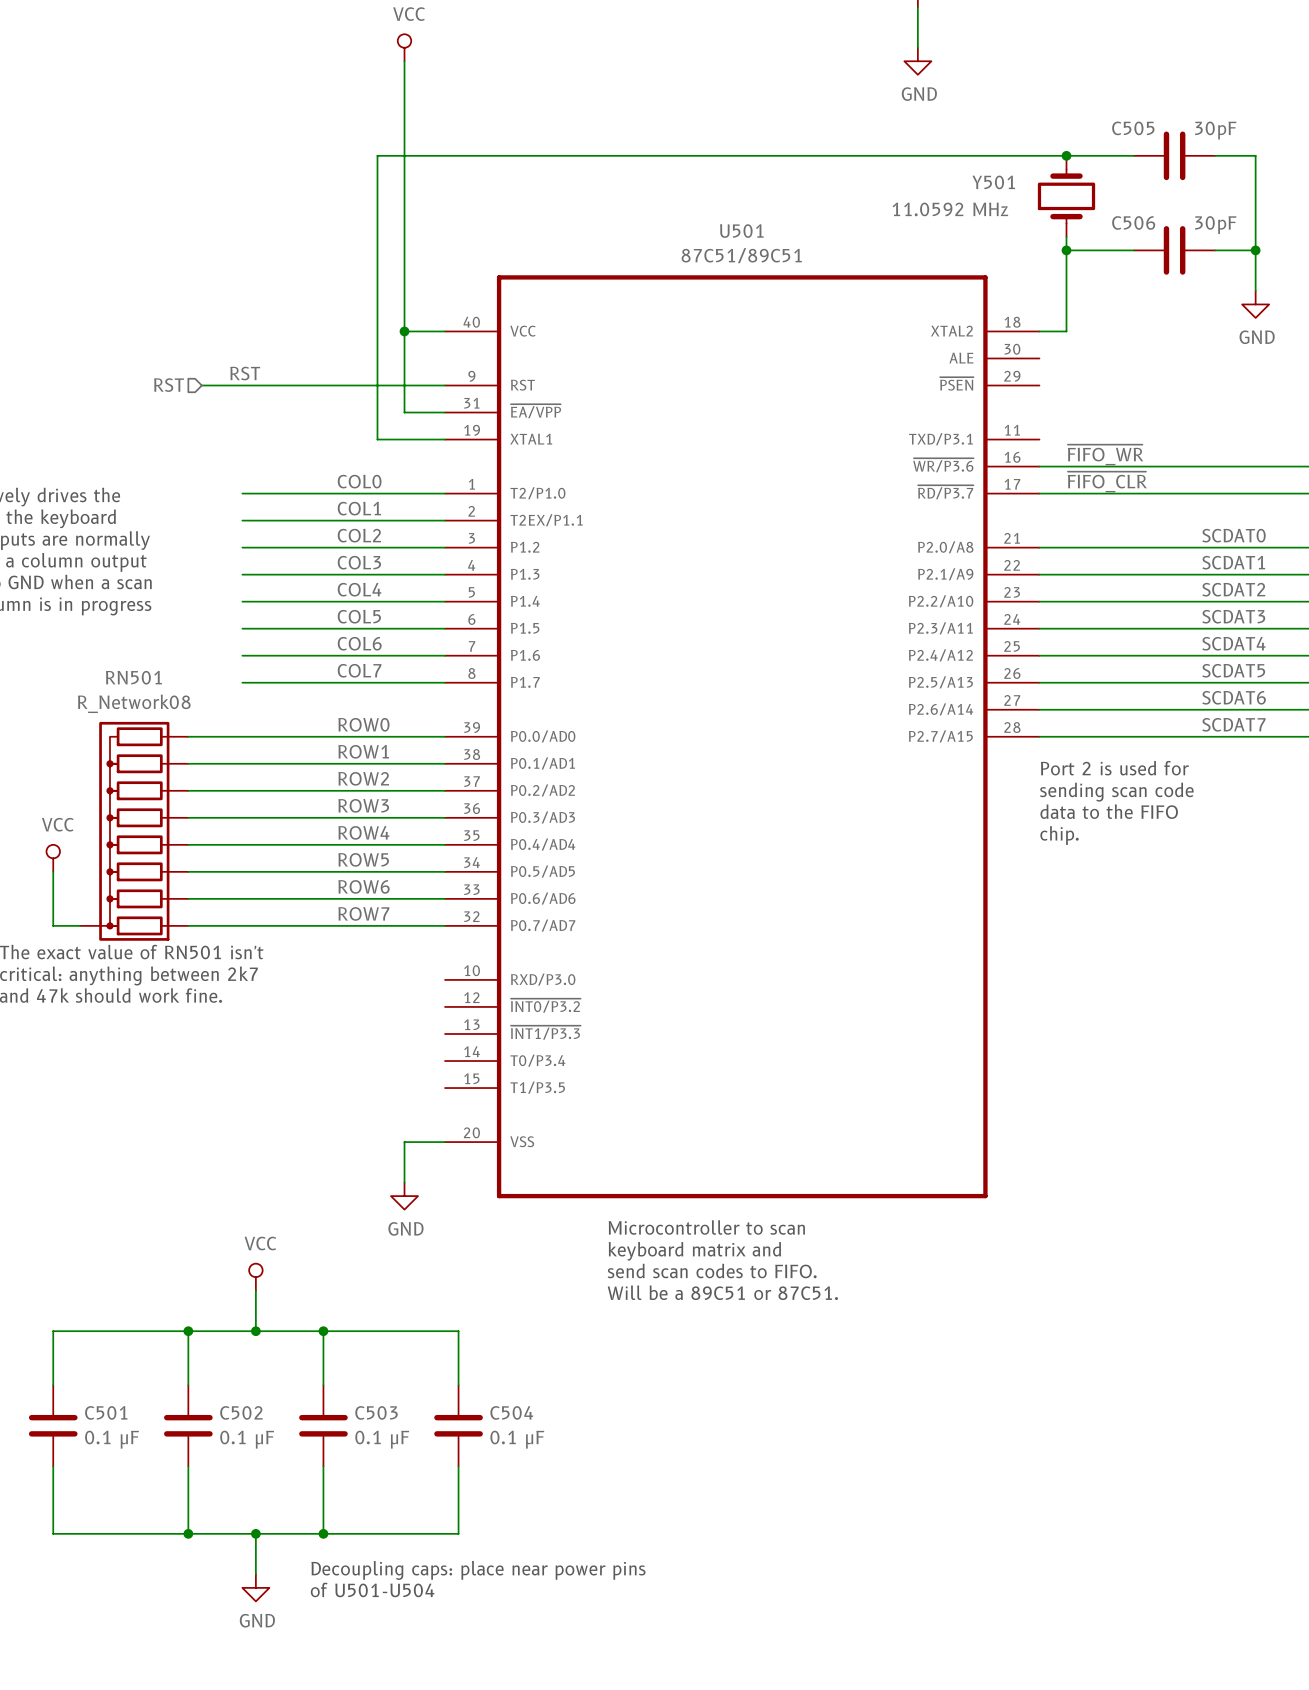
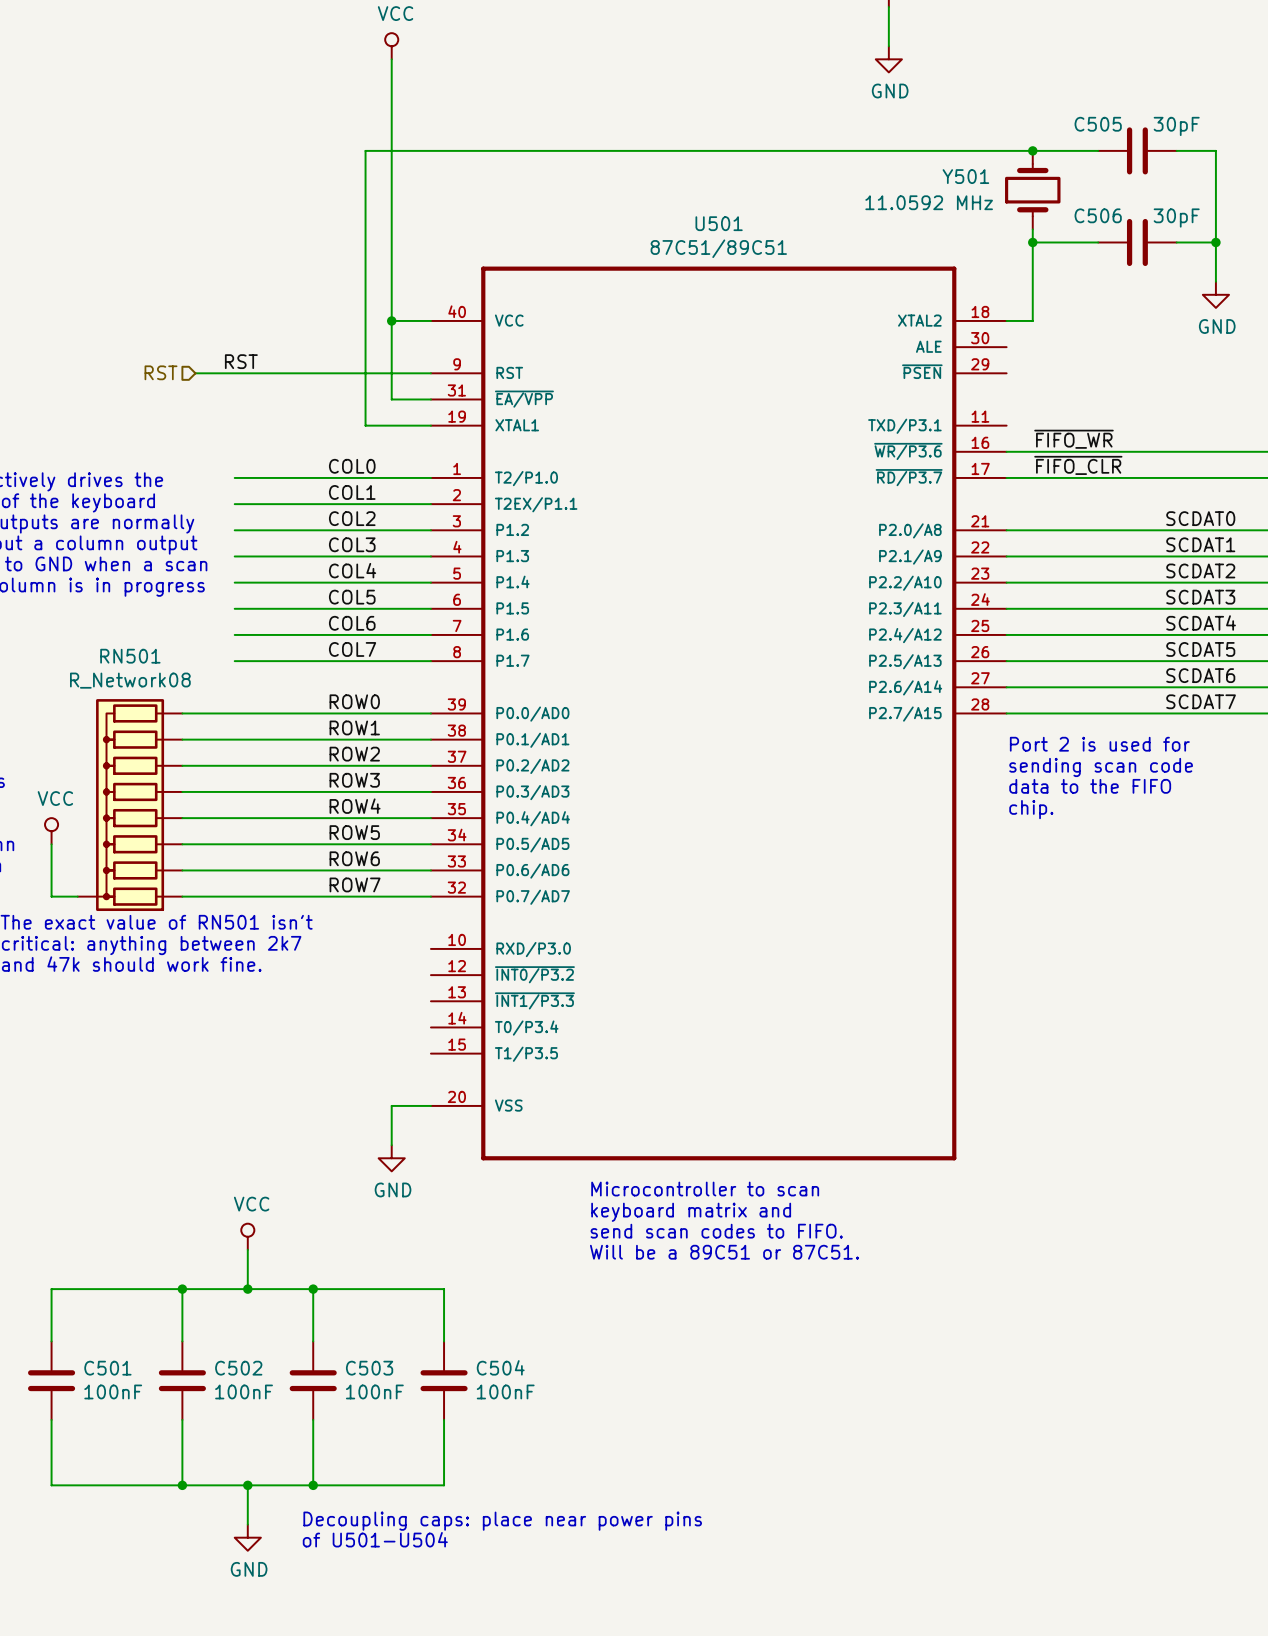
C501 value: 0.1 μF (112, 1439) -> 100nF (113, 1391)
C502 value: 0.1 μF (247, 1439) -> 100nF (244, 1391)
C503 value: 0.1 μF (382, 1439) -> 100nF (374, 1391)
C504 value: 0.1 μF (517, 1439) -> 100nF (505, 1391)

